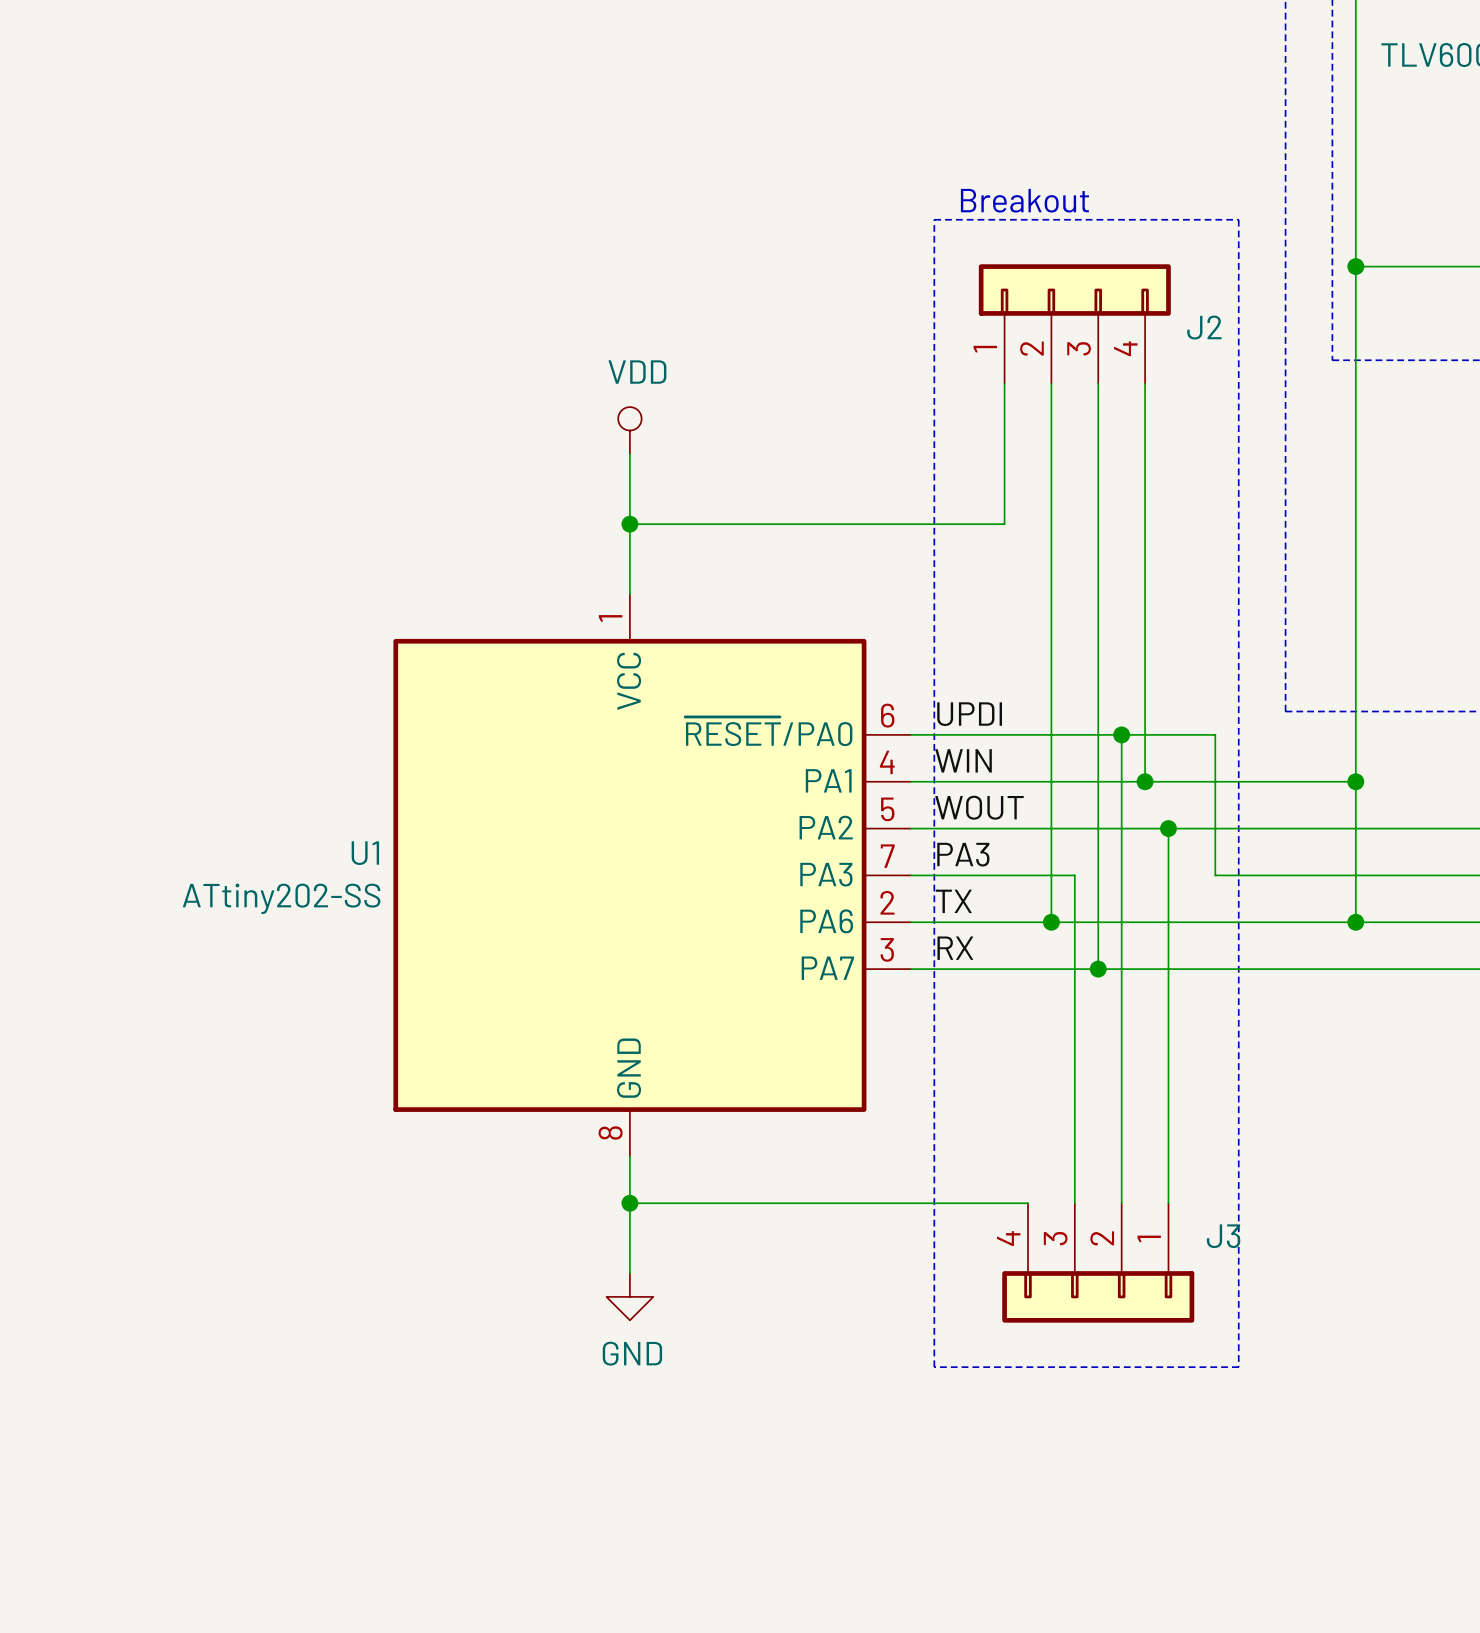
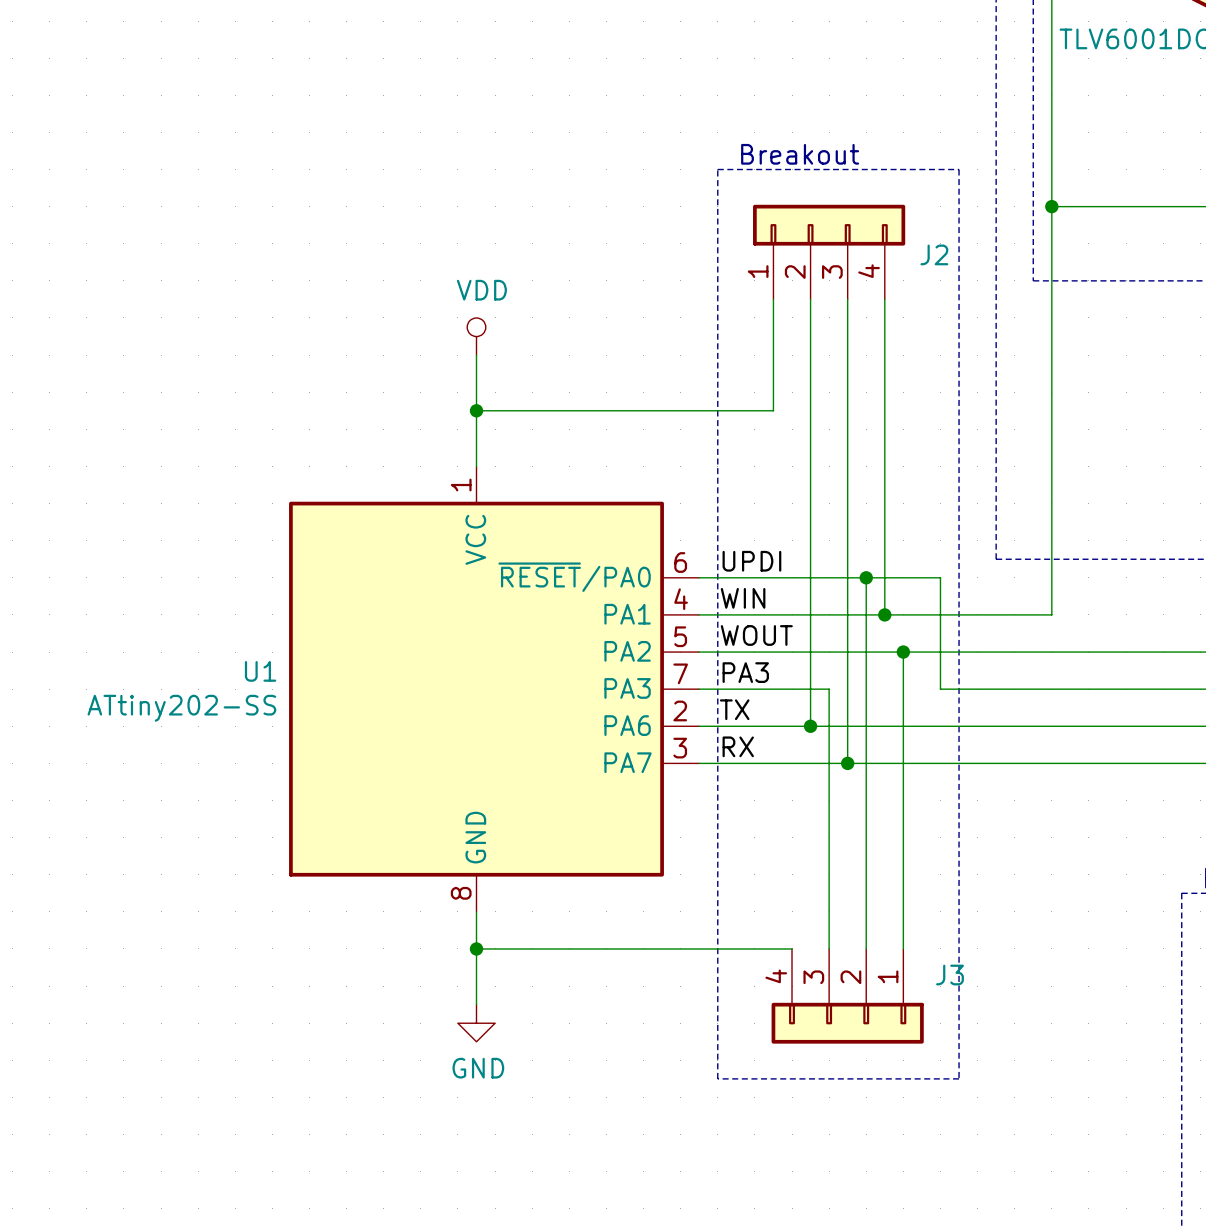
wire: (1355, 781) (1355, 922) -> none
junction: (1355, 781) -> none
junction: (1355, 922) -> none

